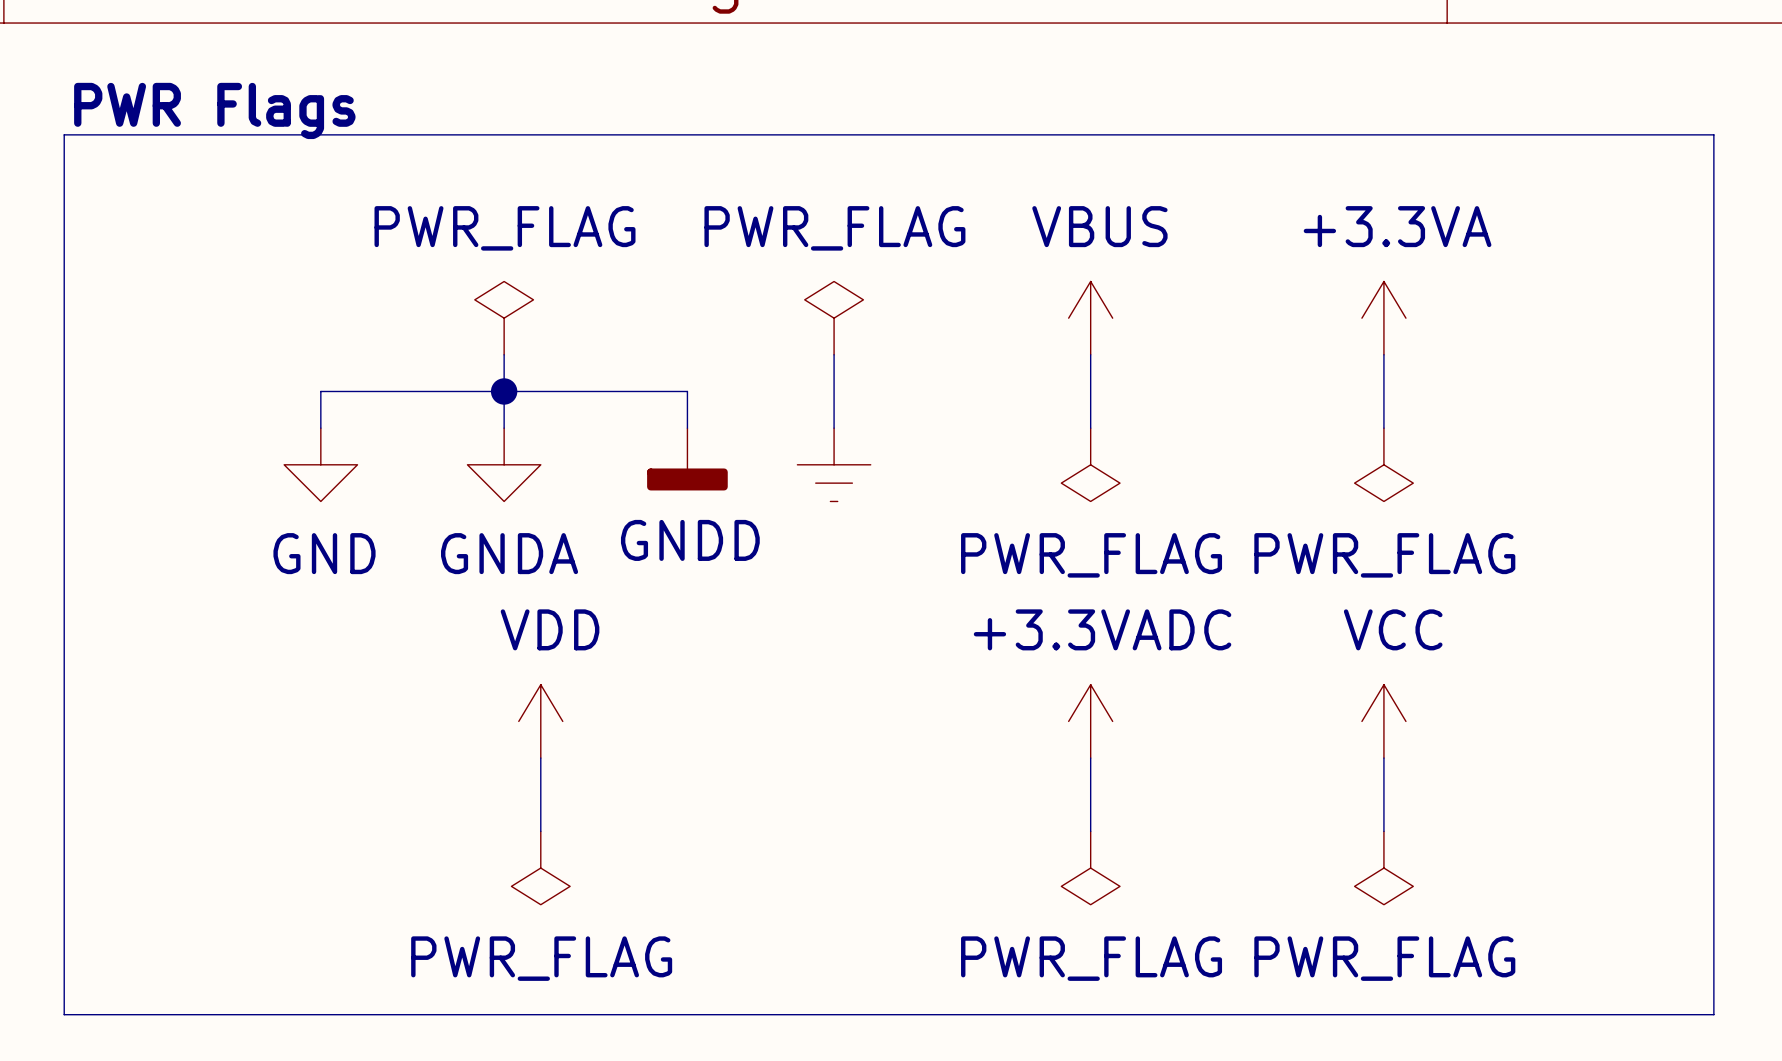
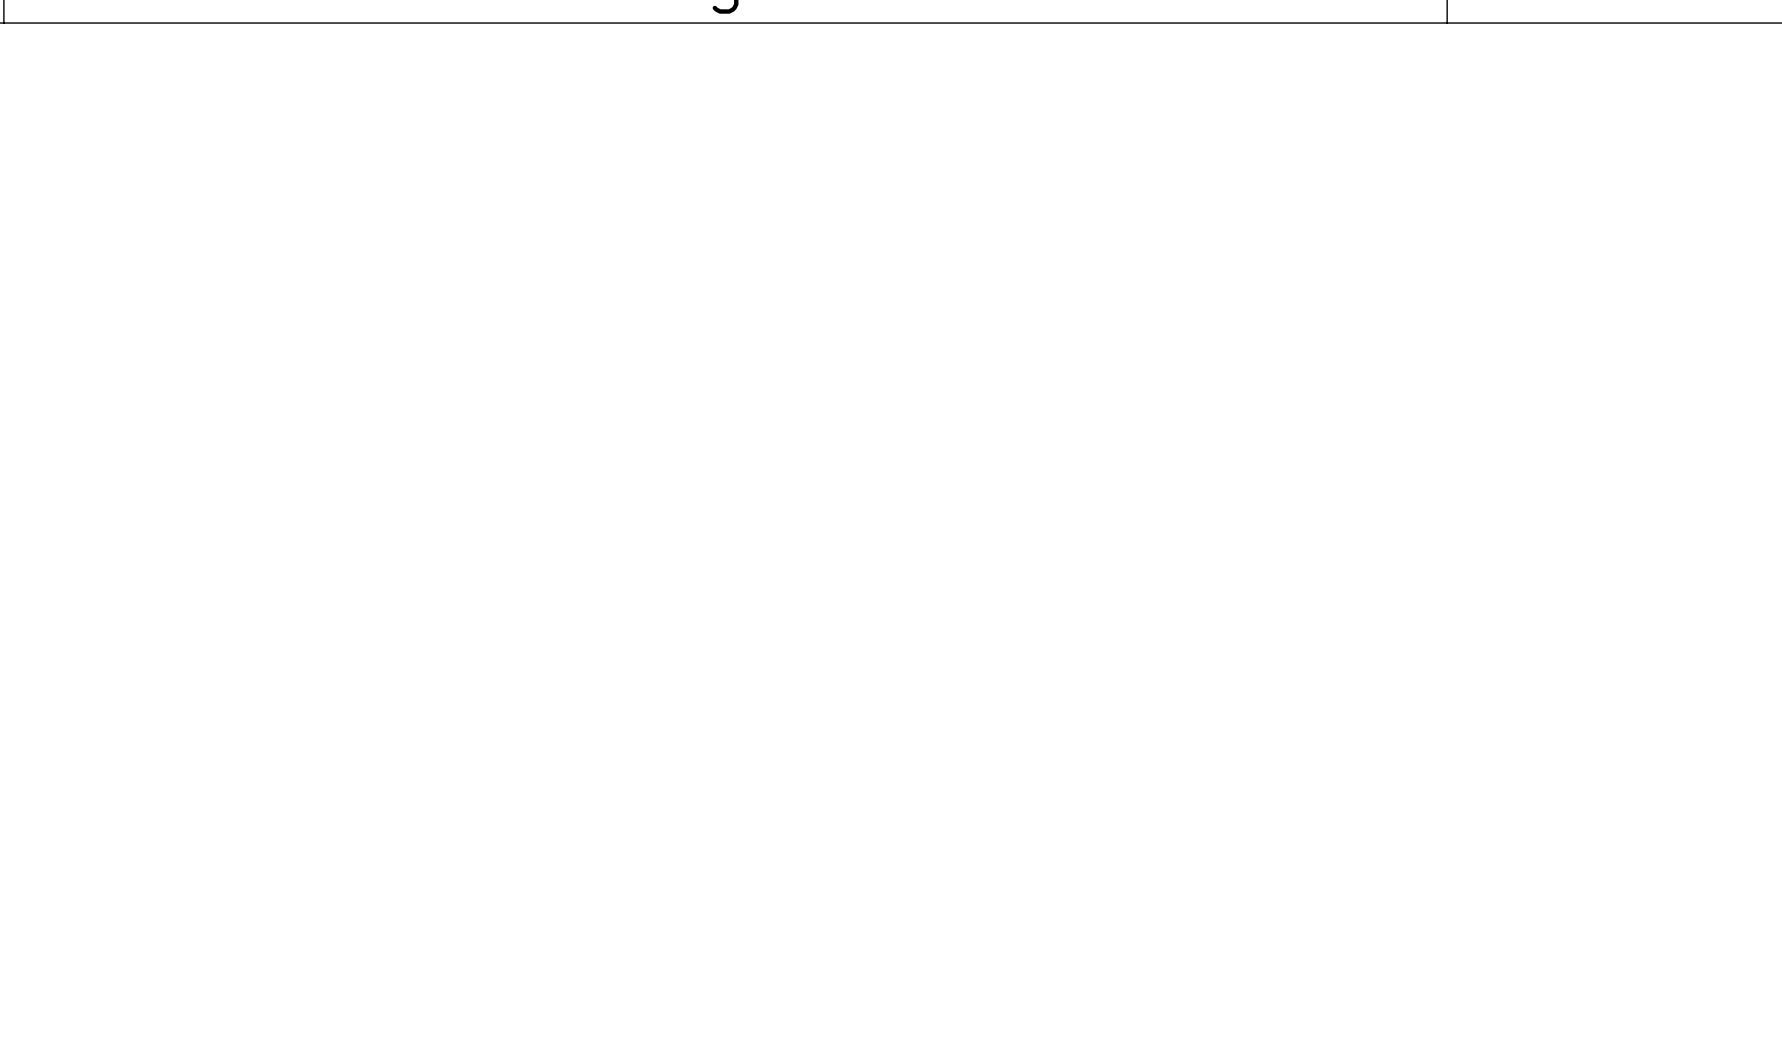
text: PWR Flags (214, 110) -> none
line: (64, 134) (64, 1014) (1713, 1014) (1713, 134) (64, 134) -> none
power symbol: PWR_FLAG (504, 318) -> none
power symbol: PWR_FLAG (834, 318) -> none
power symbol: VBUS (1090, 318) -> none
power symbol: +3.3VA (1383, 318) -> none
wire: (504, 354) (504, 428) -> none
wire: (834, 354) (834, 428) -> none
wire: (1090, 354) (1090, 428) -> none
wire: (1383, 354) (1383, 428) -> none
junction: (504, 391) -> none
wire: (320, 428) (320, 391) (687, 391) (687, 428) -> none
power symbol: GNDD (687, 459) -> none
power symbol: GND (320, 464) -> none
power symbol: GNDA (504, 464) -> none
power symbol: (834, 464) -> none
power symbol: PWR_FLAG (1090, 464) -> none
power symbol: PWR_FLAG (1383, 464) -> none
power symbol: VDD (540, 721) -> none
power symbol: +3.3VADC (1090, 721) -> none
power symbol: VCC (1383, 721) -> none
wire: (540, 758) (540, 831) -> none
wire: (1090, 758) (1090, 831) -> none
wire: (1383, 758) (1383, 831) -> none
power symbol: PWR_FLAG (540, 868) -> none
power symbol: PWR_FLAG (1090, 868) -> none
power symbol: PWR_FLAG (1383, 868) -> none

